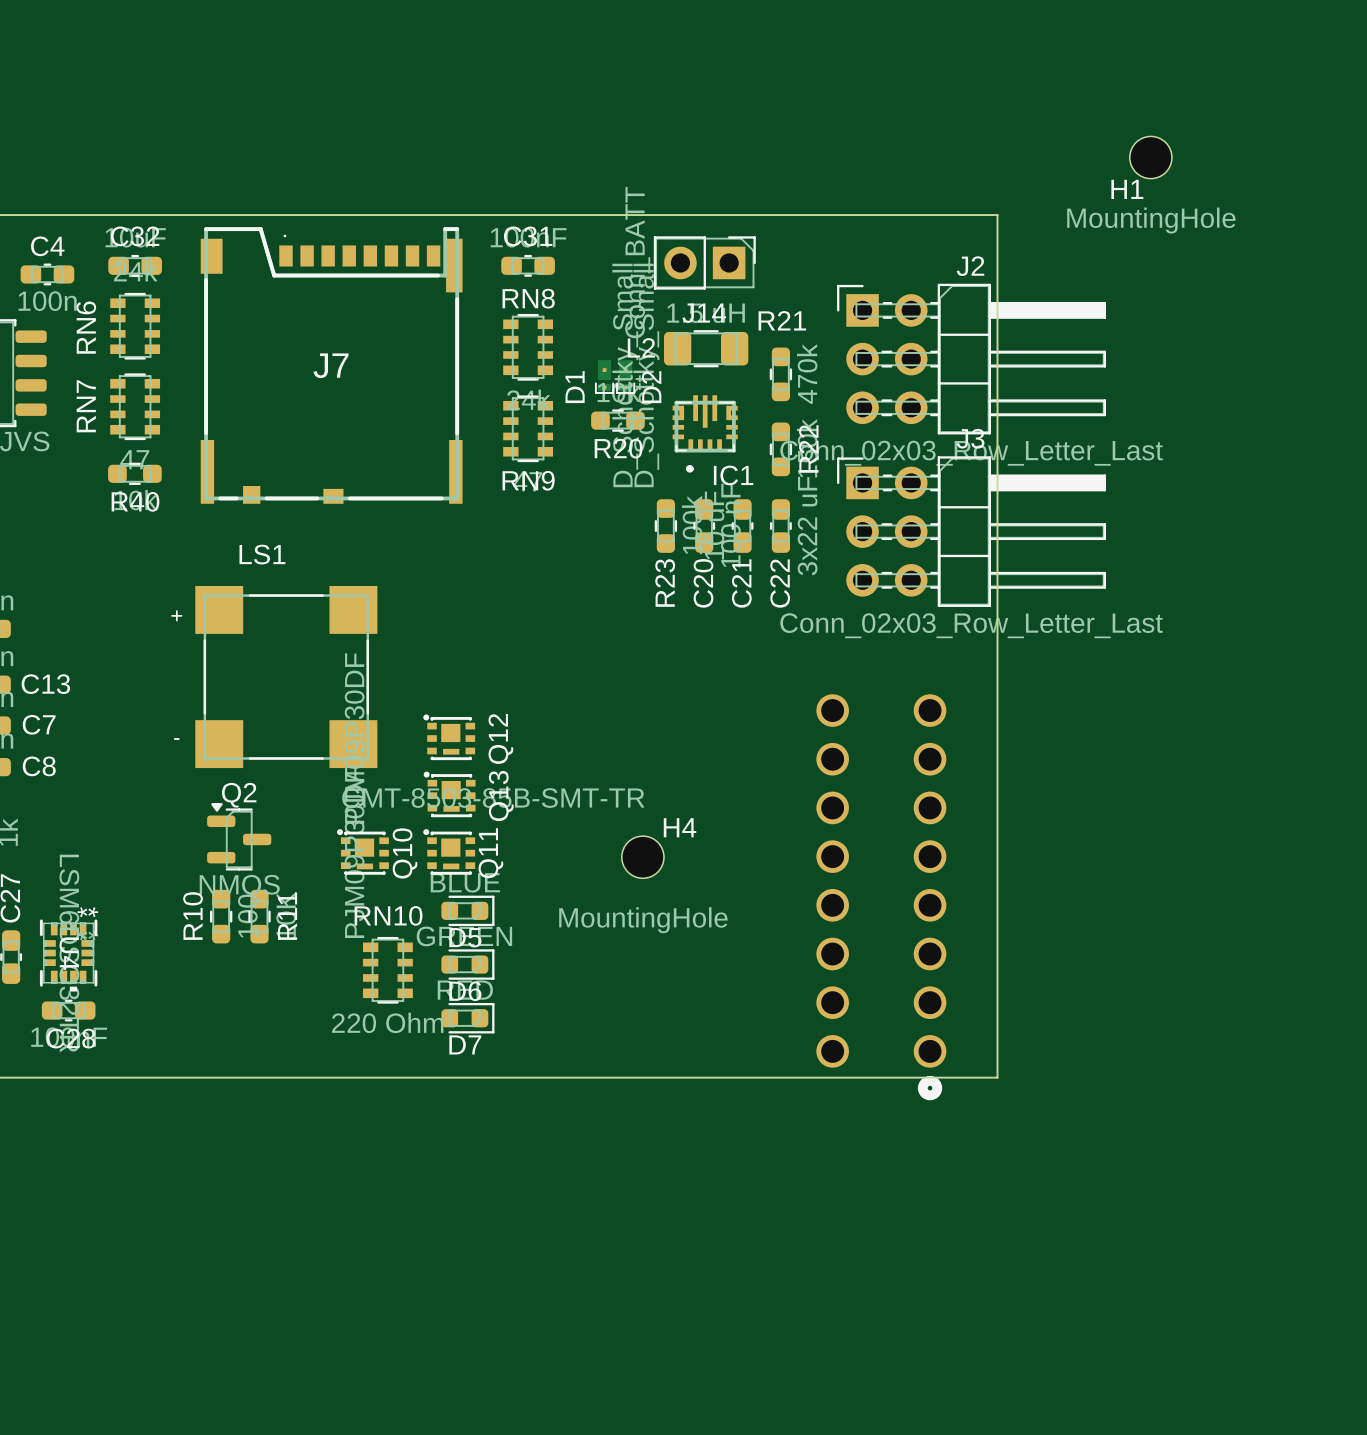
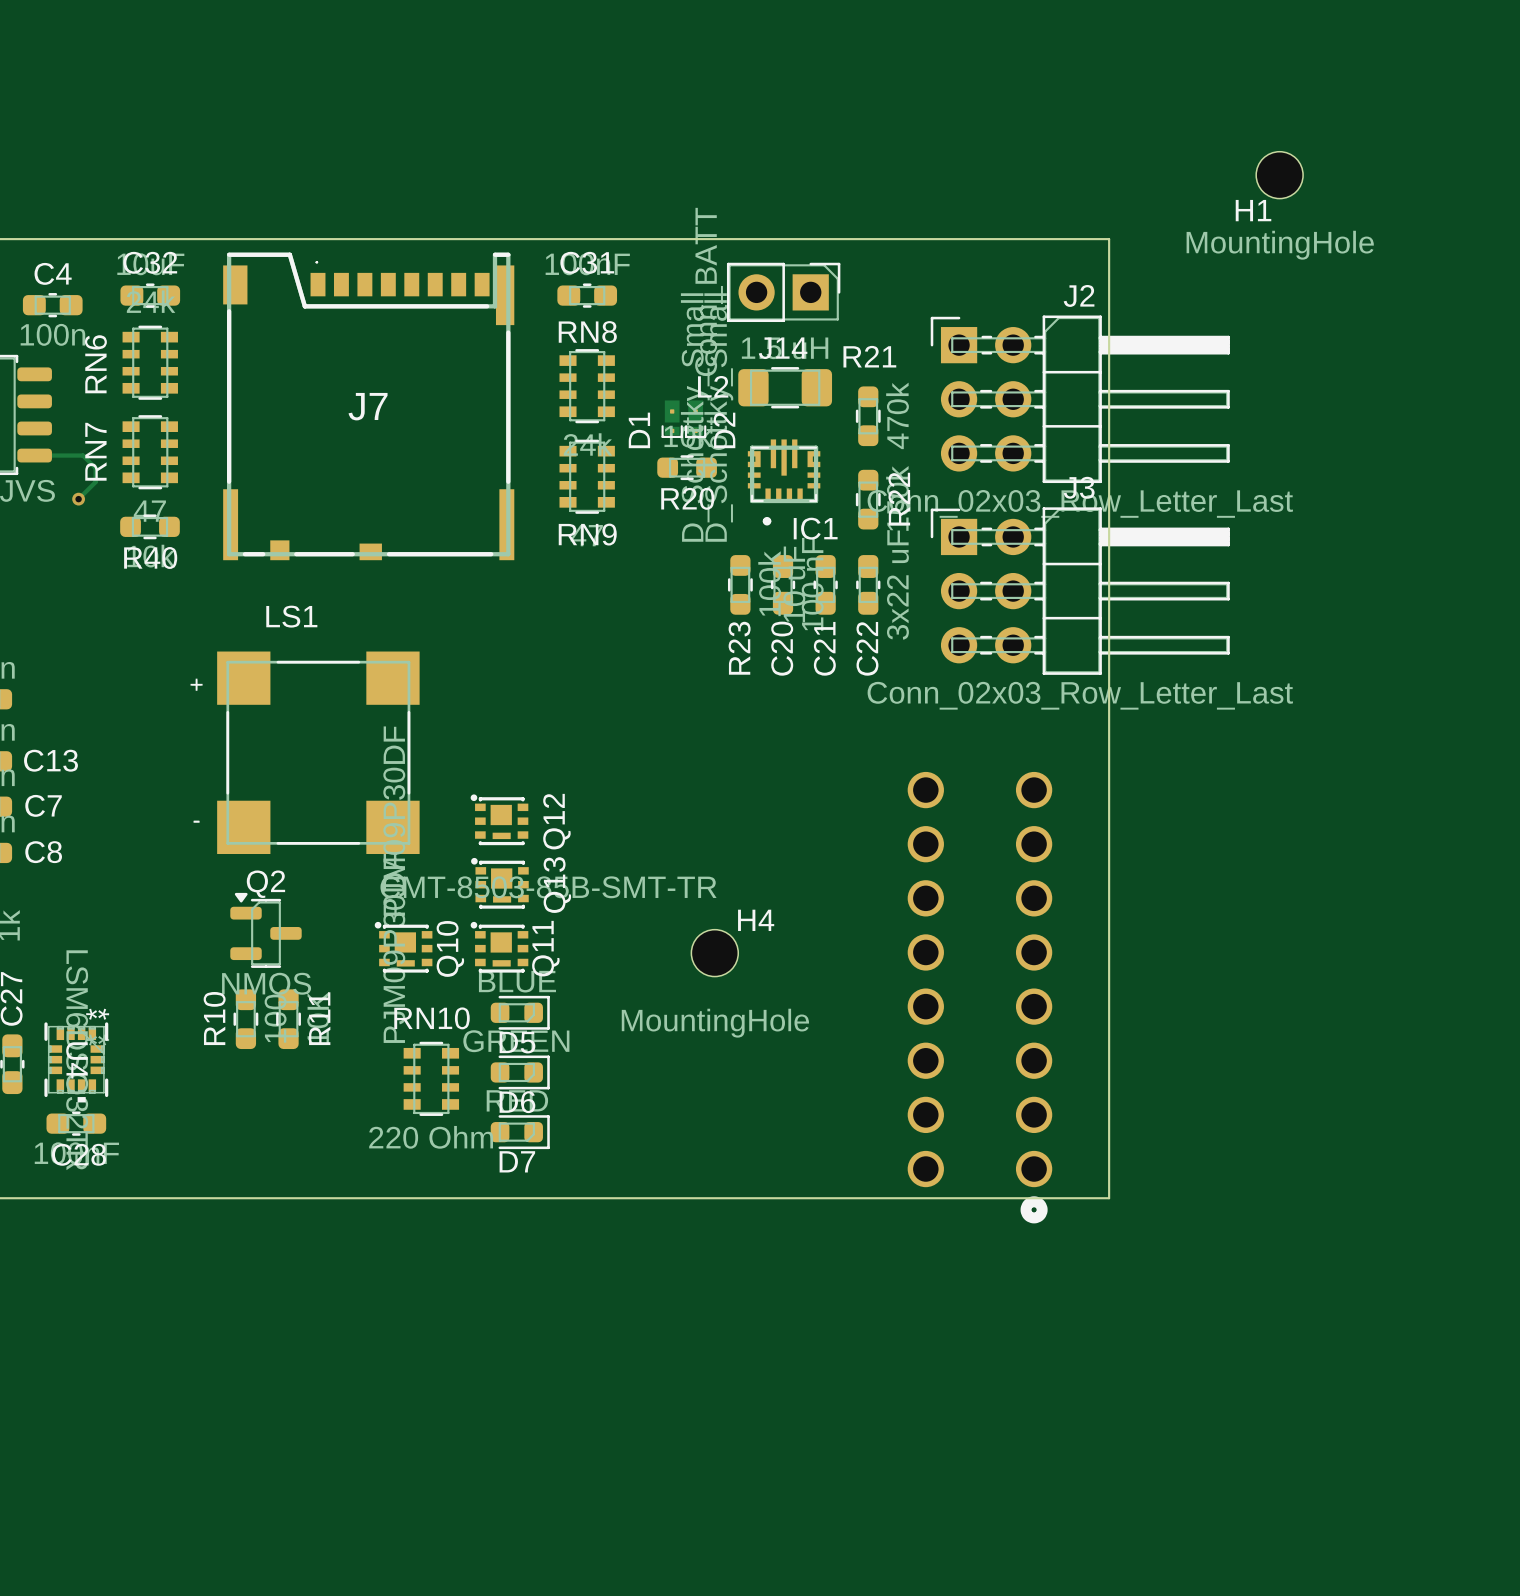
track: none -> (34, 455) (82, 455) (95, 468) (95, 482) (78, 499)
via: none -> (78, 499)

